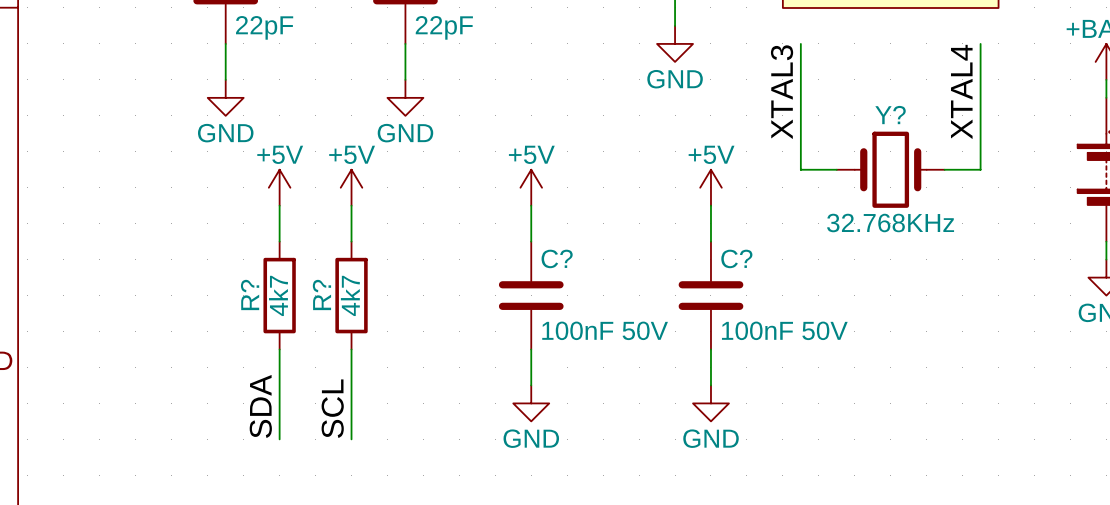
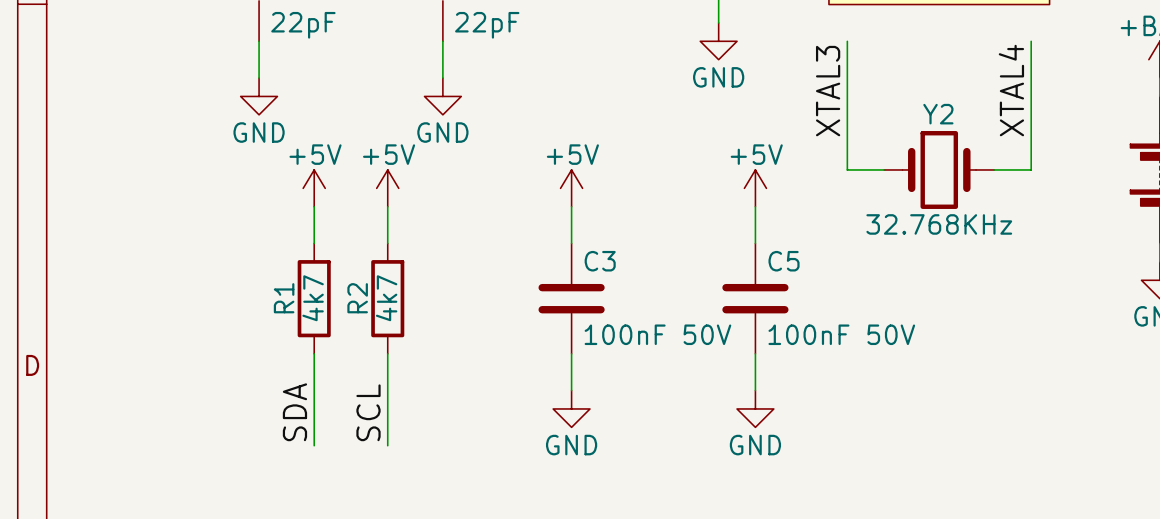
Y? name: Y? (890, 115) -> Y2 (938, 114)
C? name: C? (557, 258) -> C3 (600, 261)
C? name: C? (736, 258) -> C5 (784, 261)
R? name: R? (250, 294) -> R1 (284, 298)
R? name: R? (321, 294) -> R2 (357, 298)

